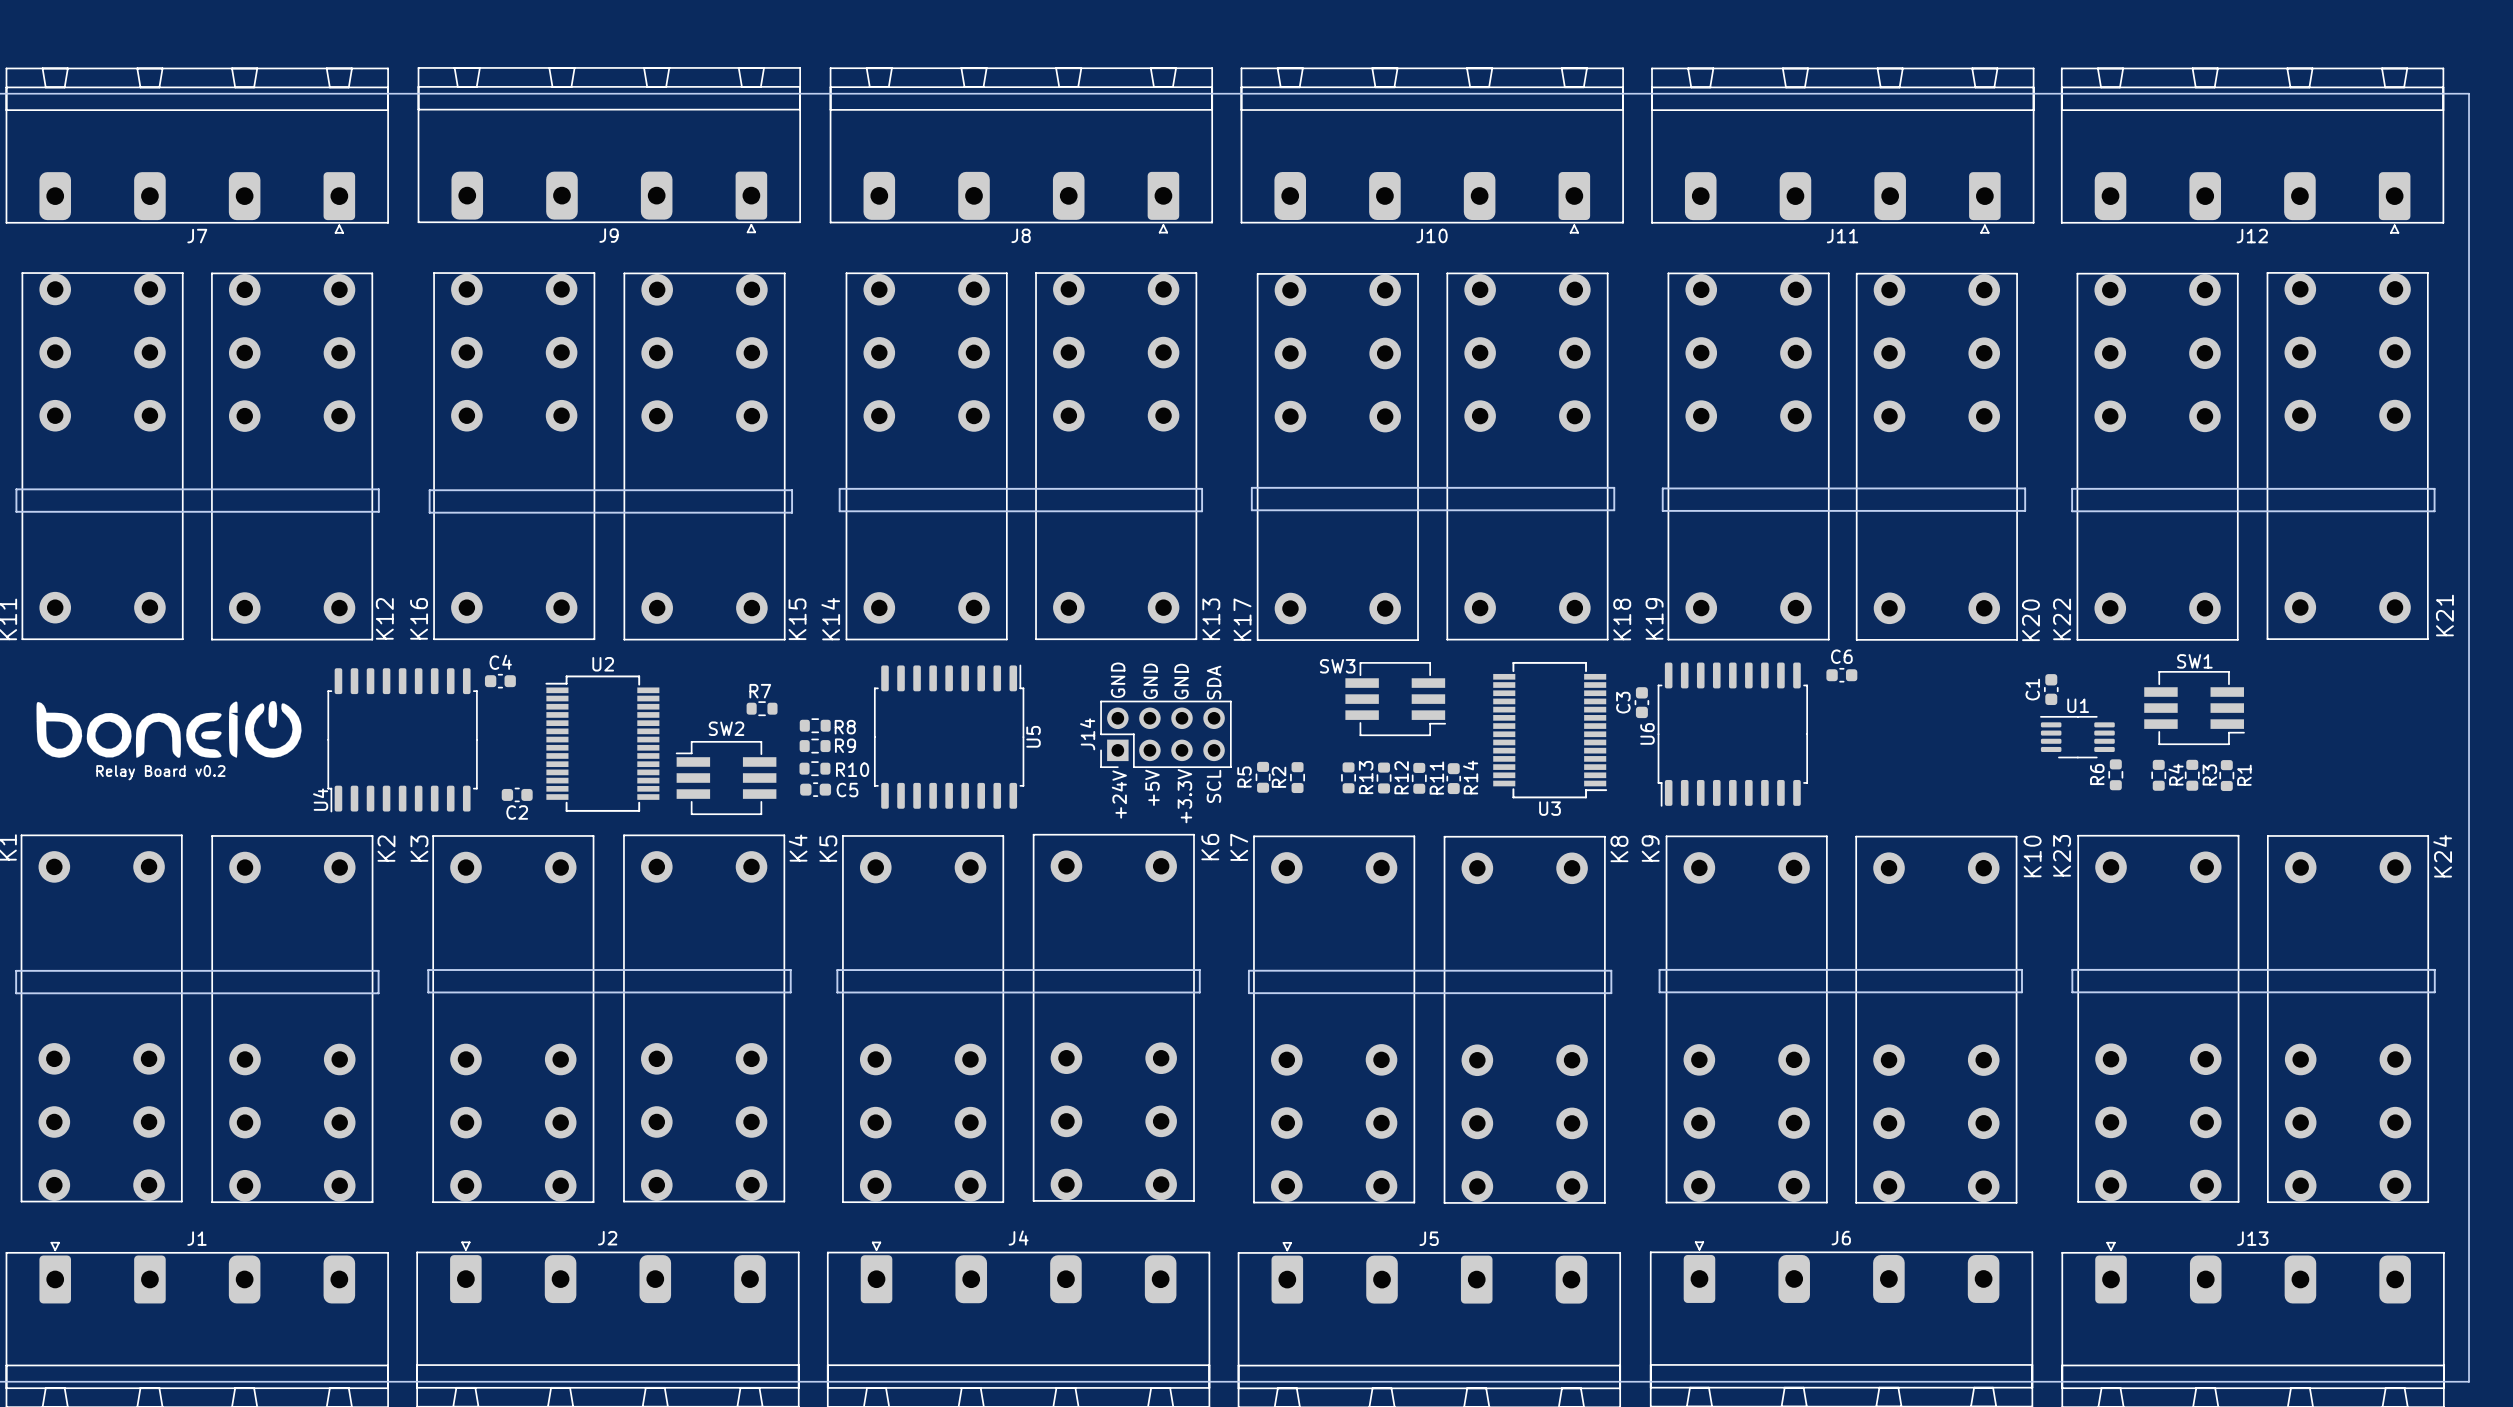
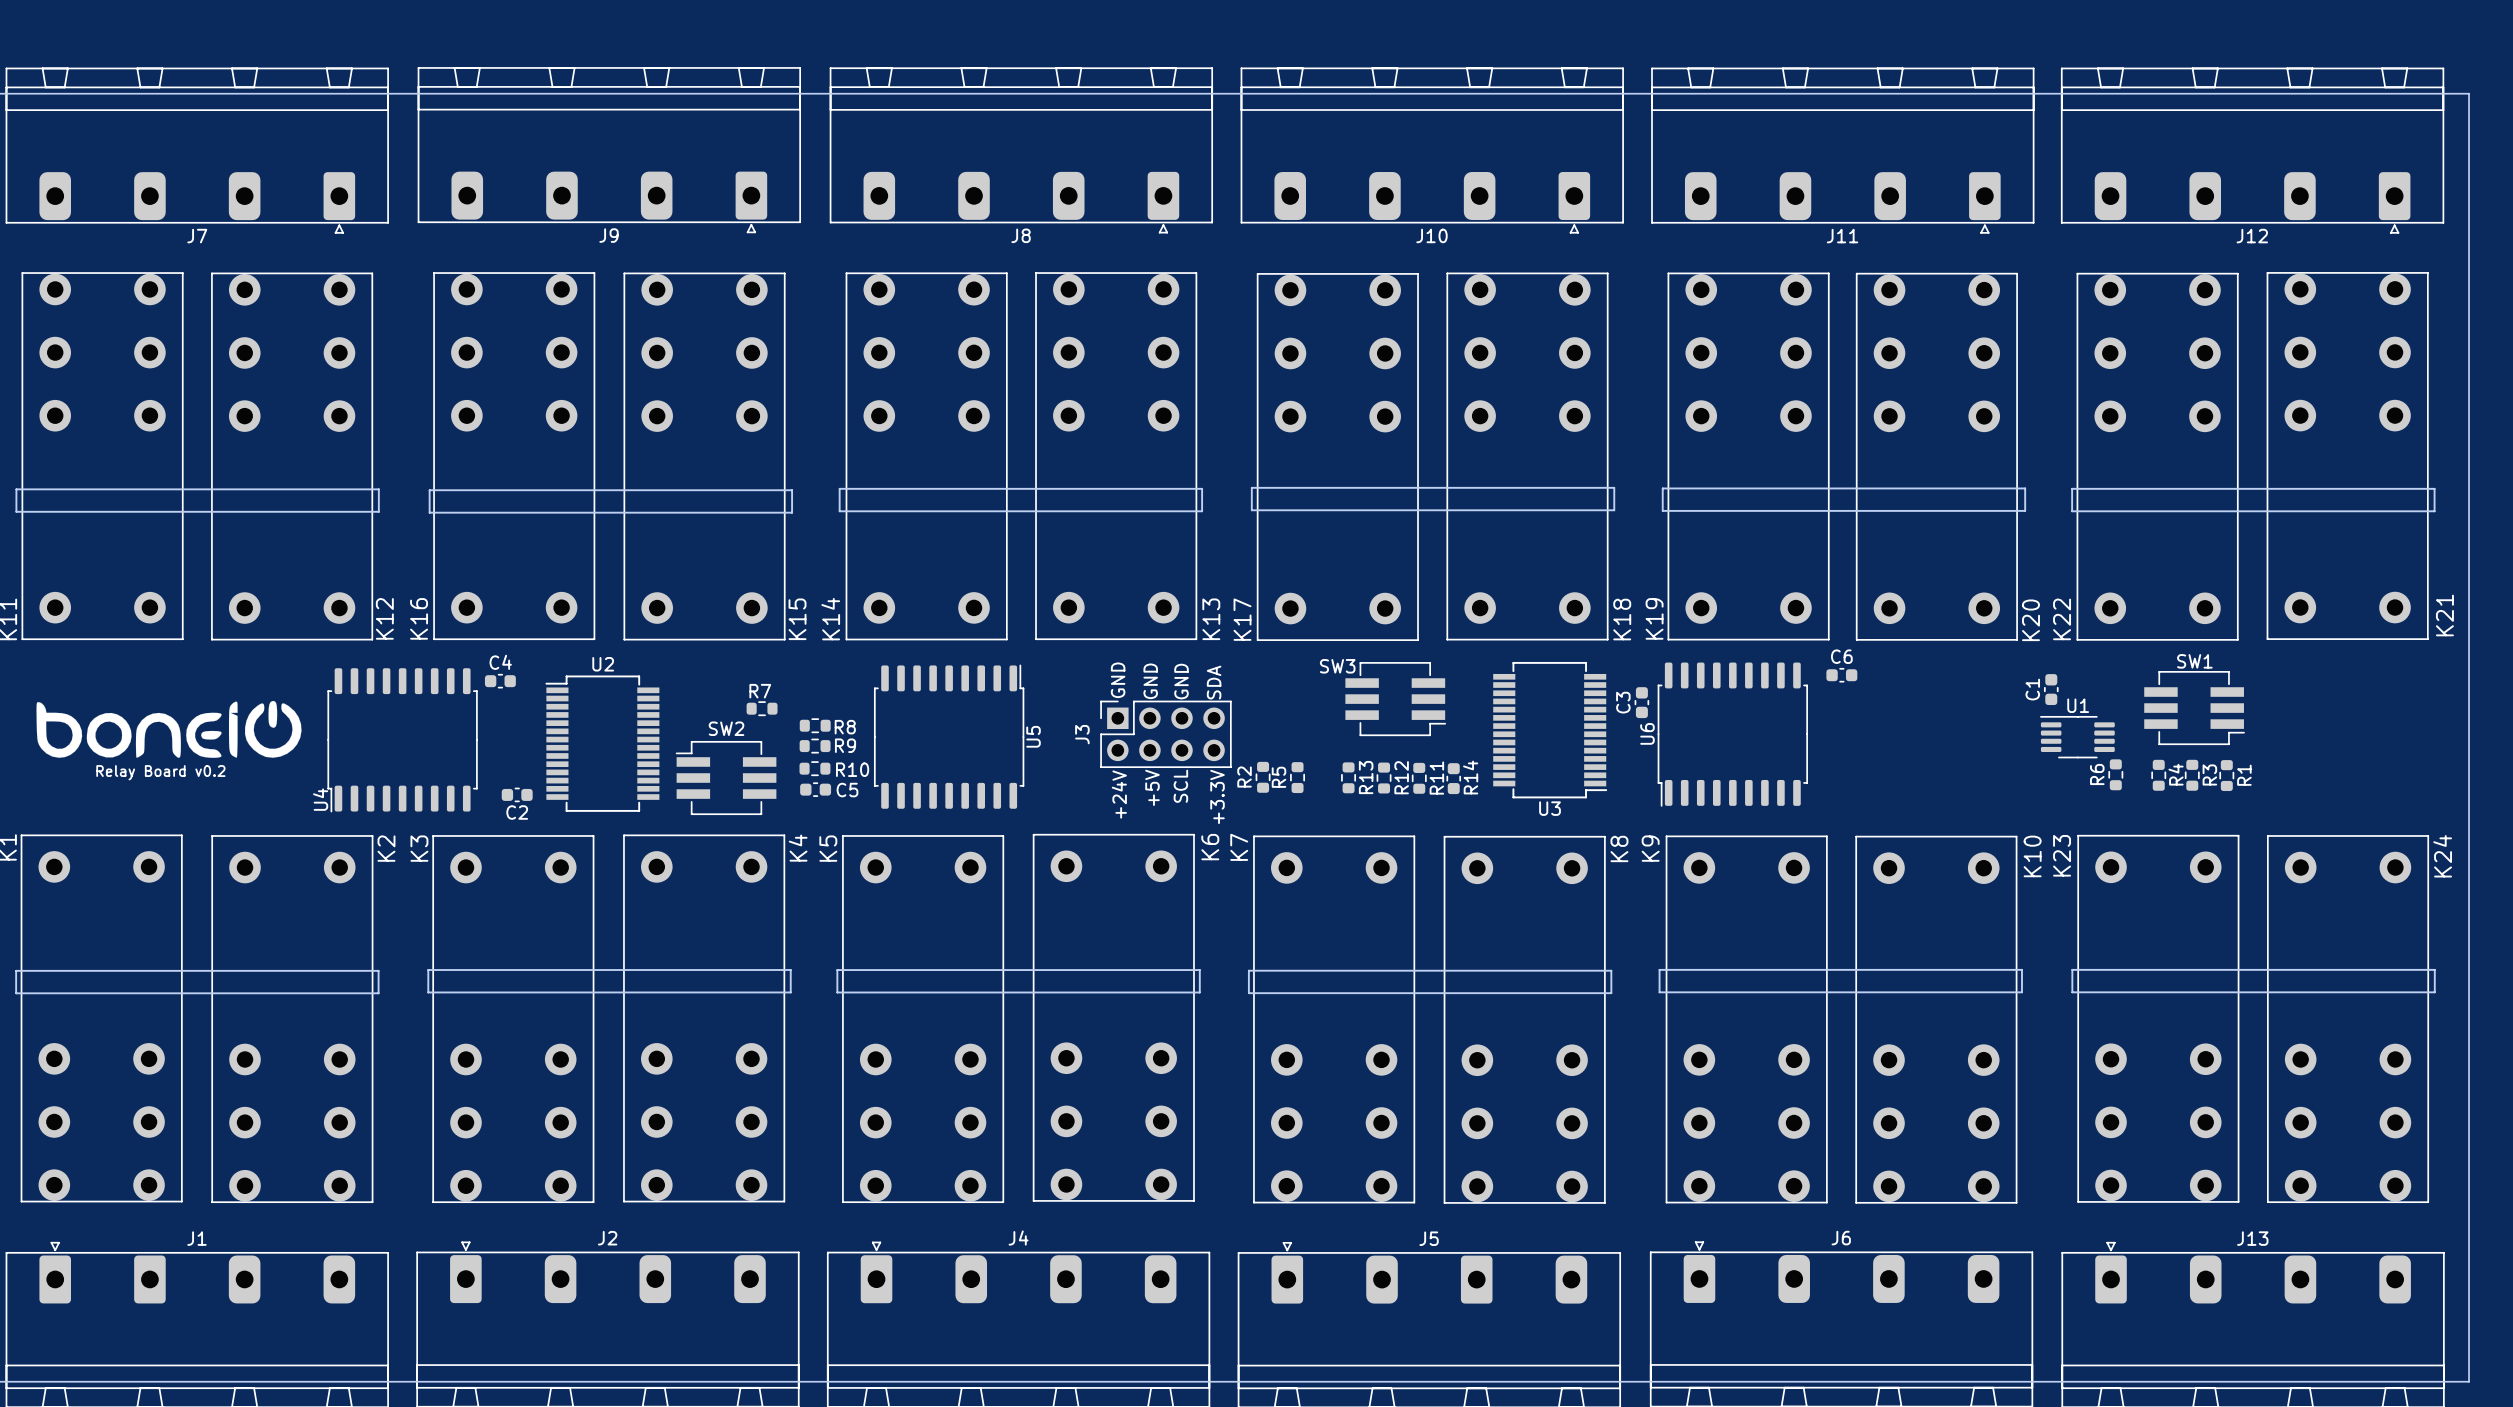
J14: (1165, 734) -> none
J3: none -> (1165, 734)
R5 name: R5 (1244, 777) -> R2 (1244, 777)
R2 name: R2 (1279, 777) -> R5 (1279, 777)
text: SCL (1213, 786) -> +3.3V (1217, 796)
text: +3.3V (1184, 796) -> SCL (1180, 786)

